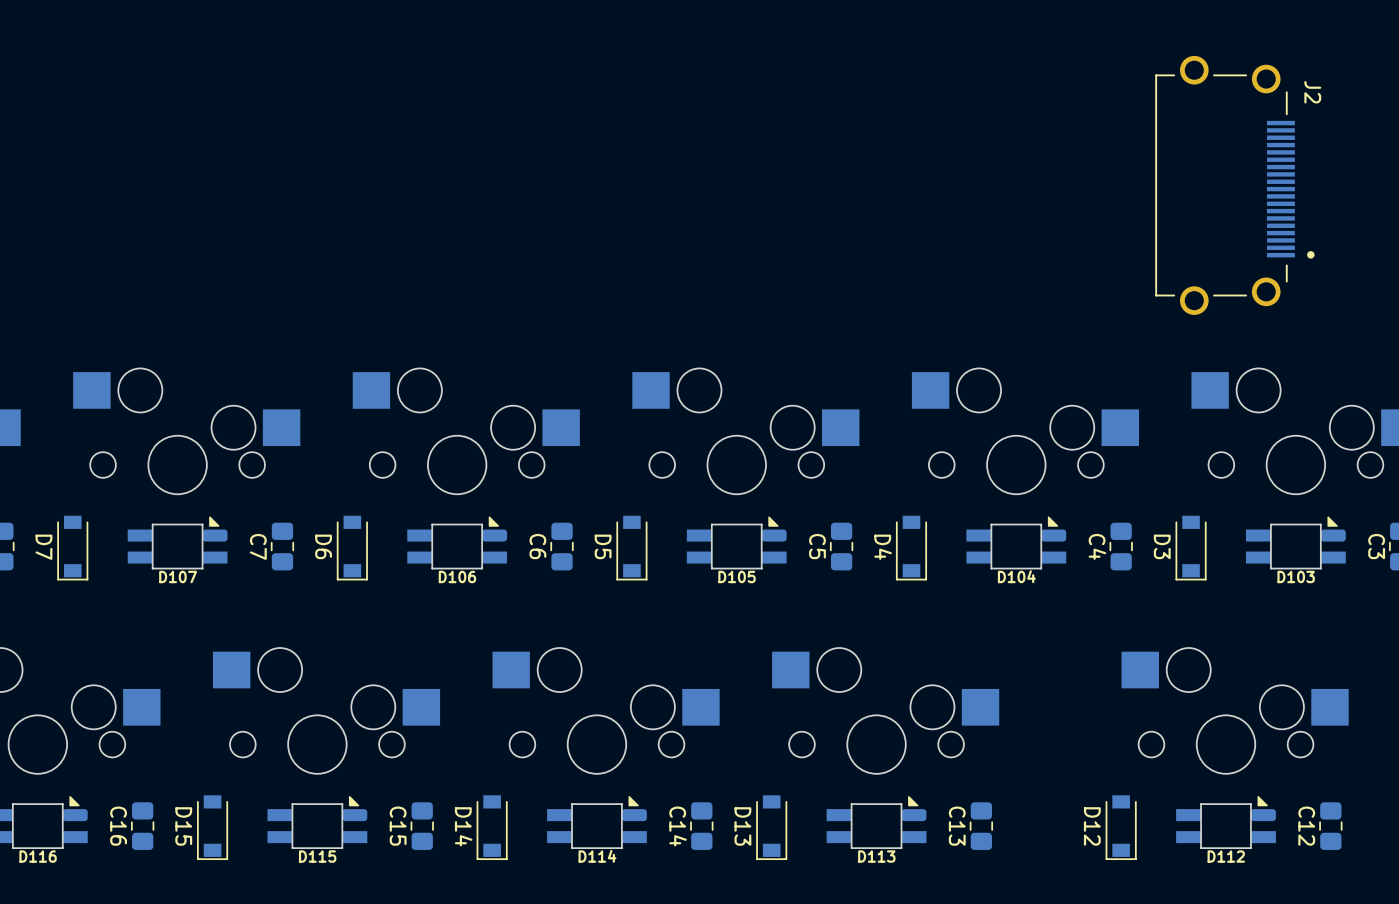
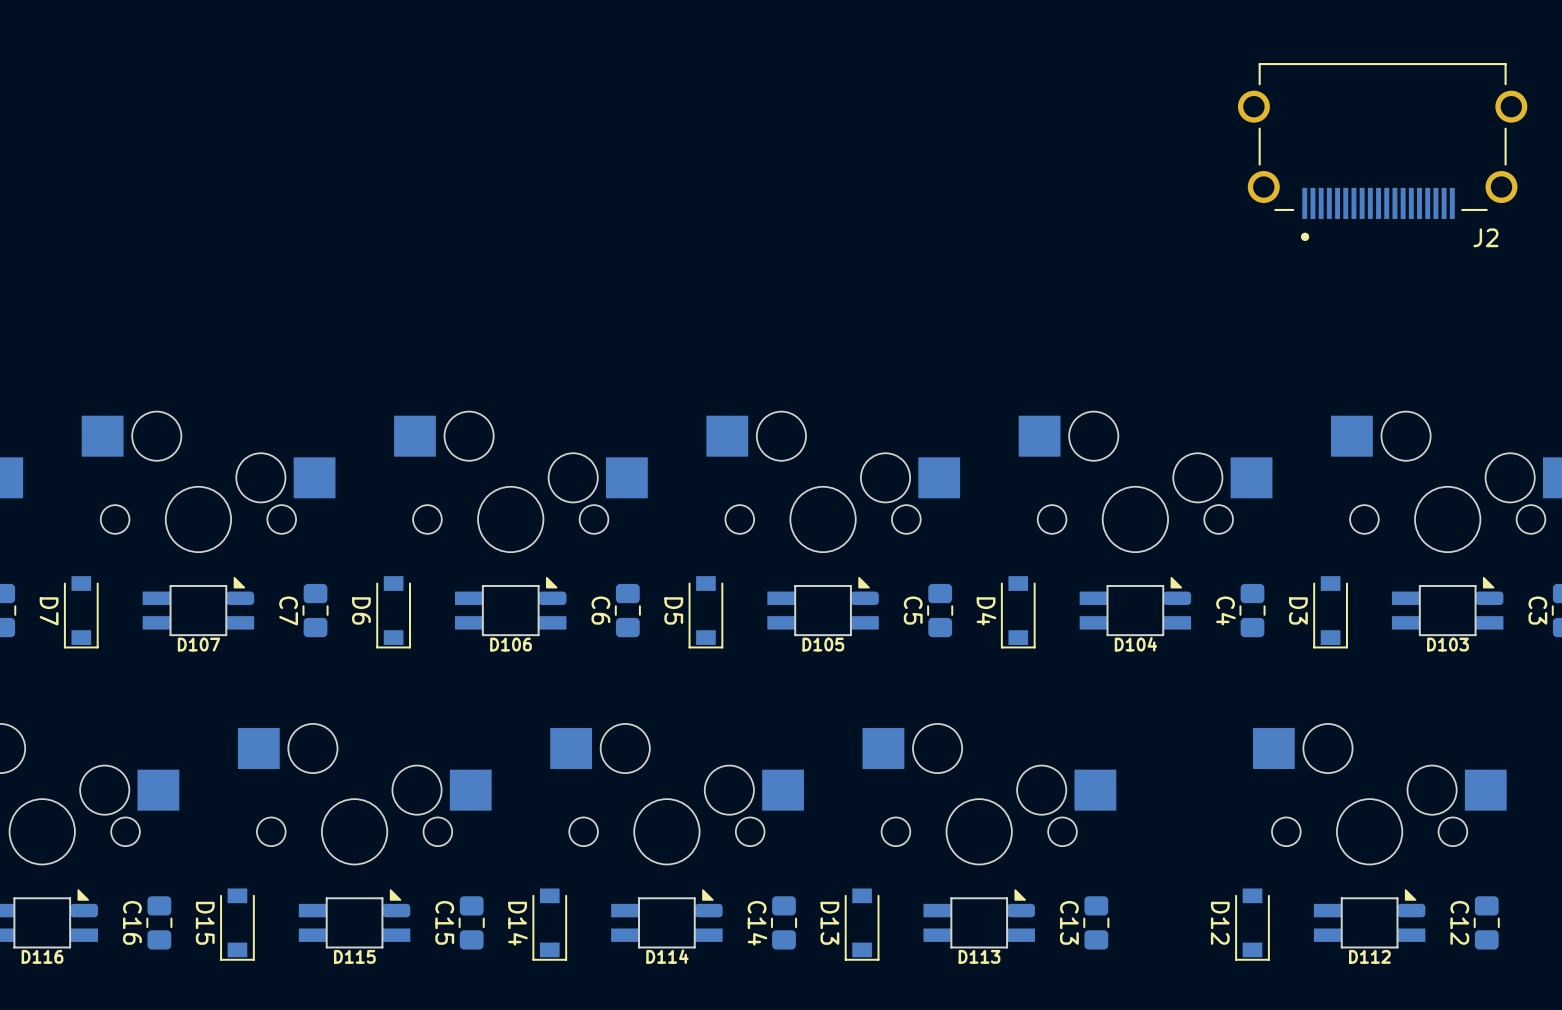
J2 rotation: 0° (1234, 185) -> 90° clockwise (1382, 152)

